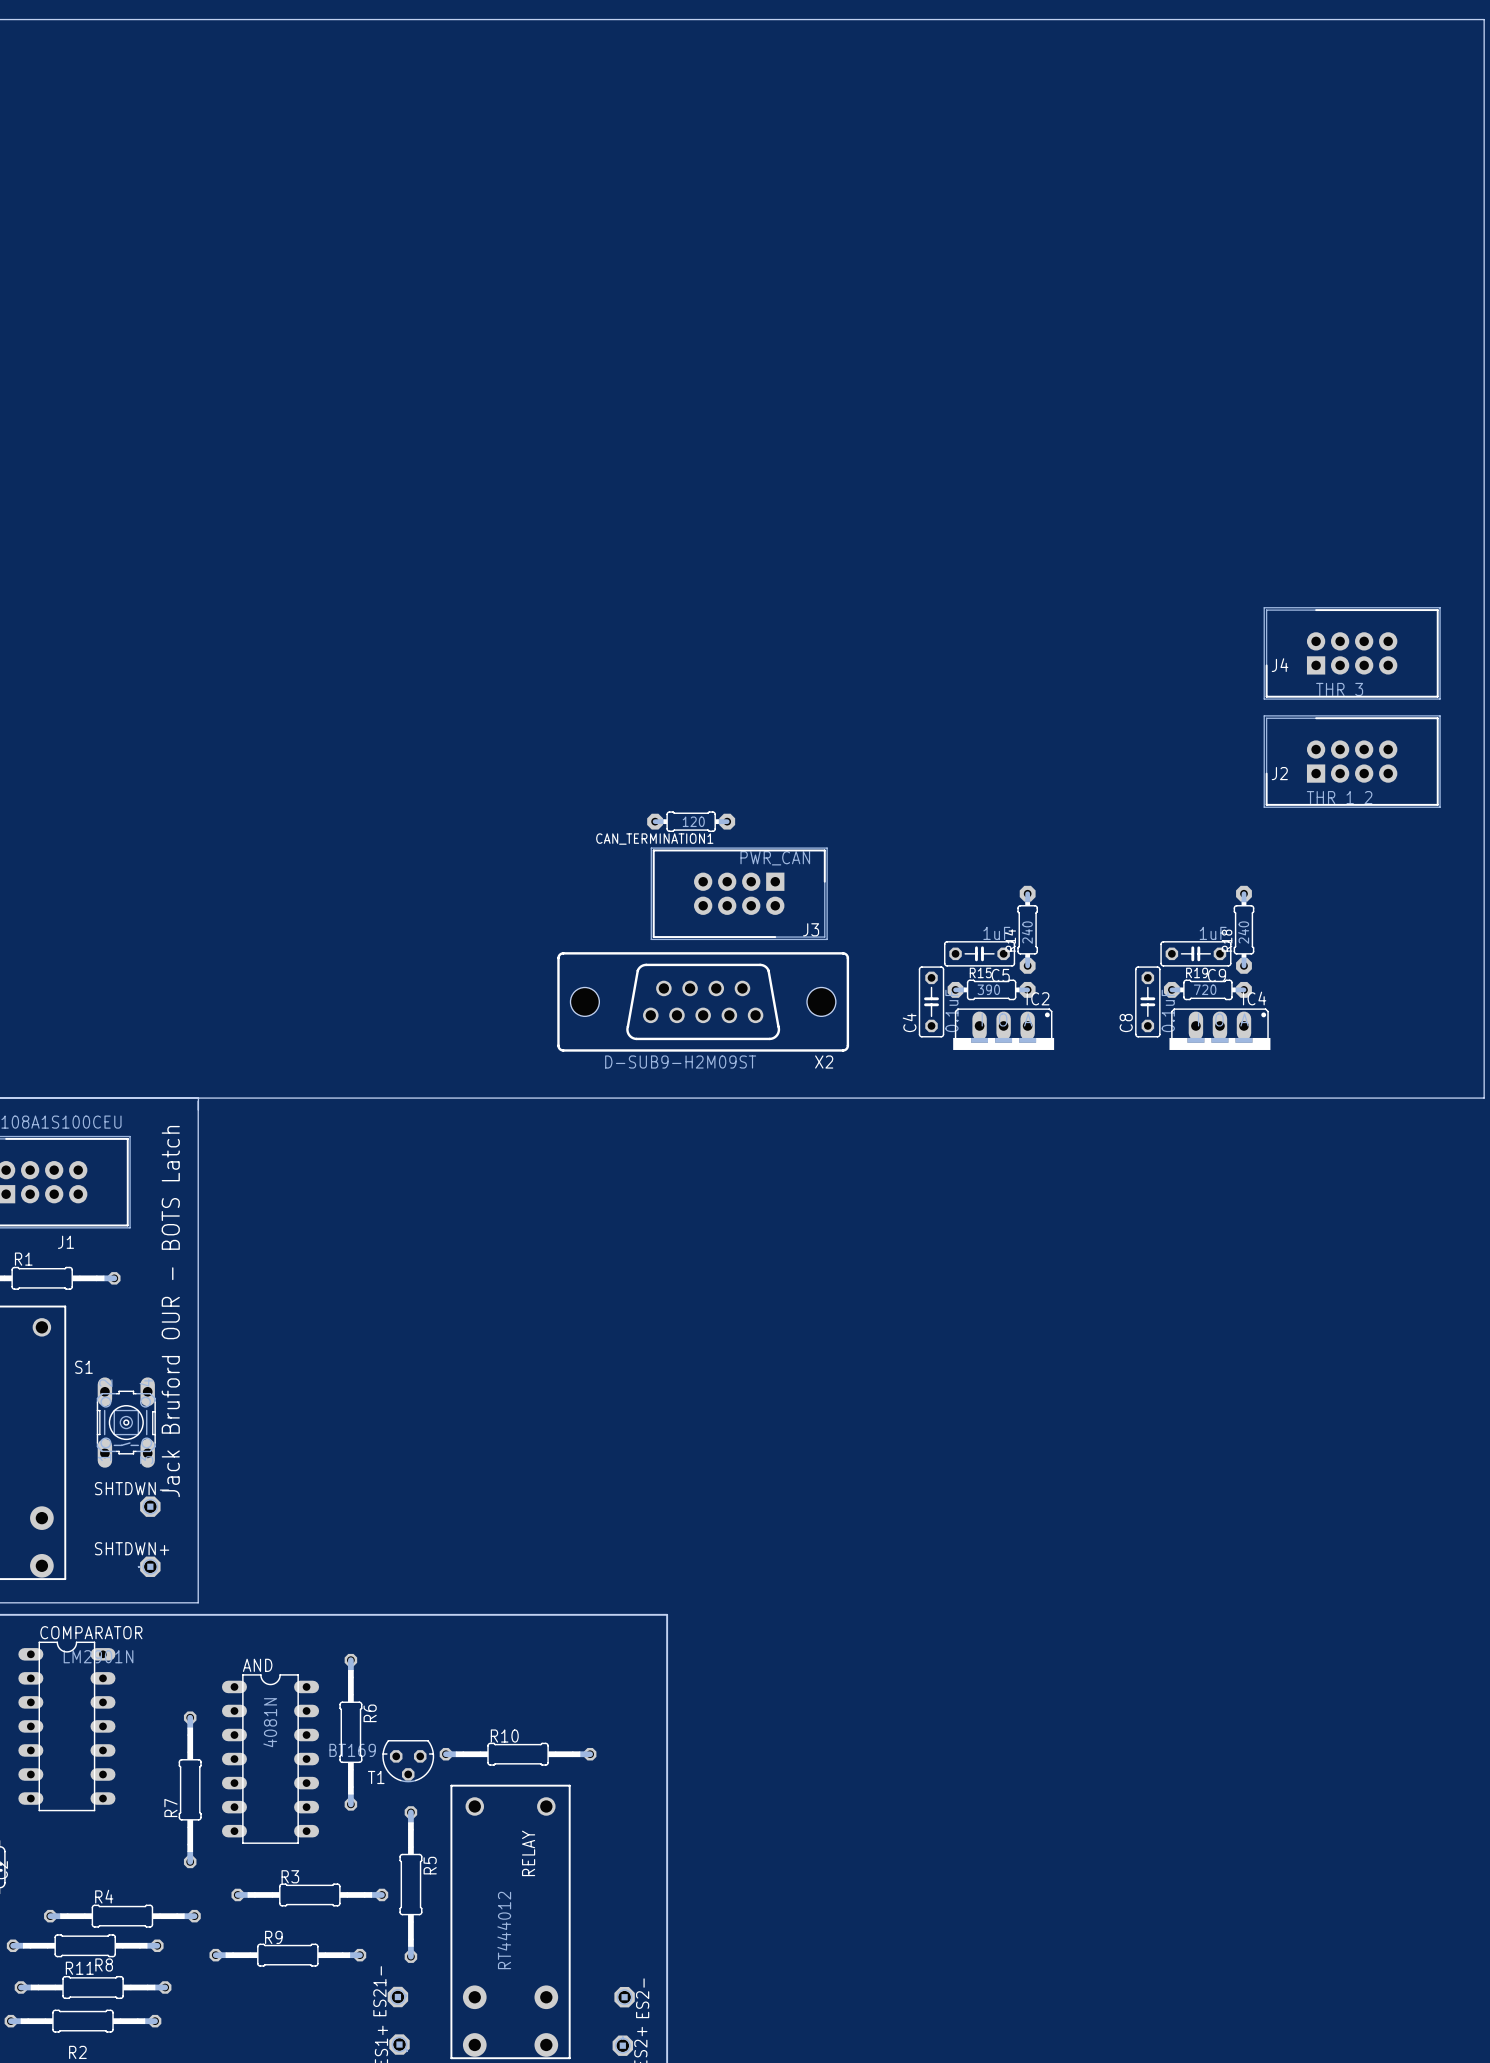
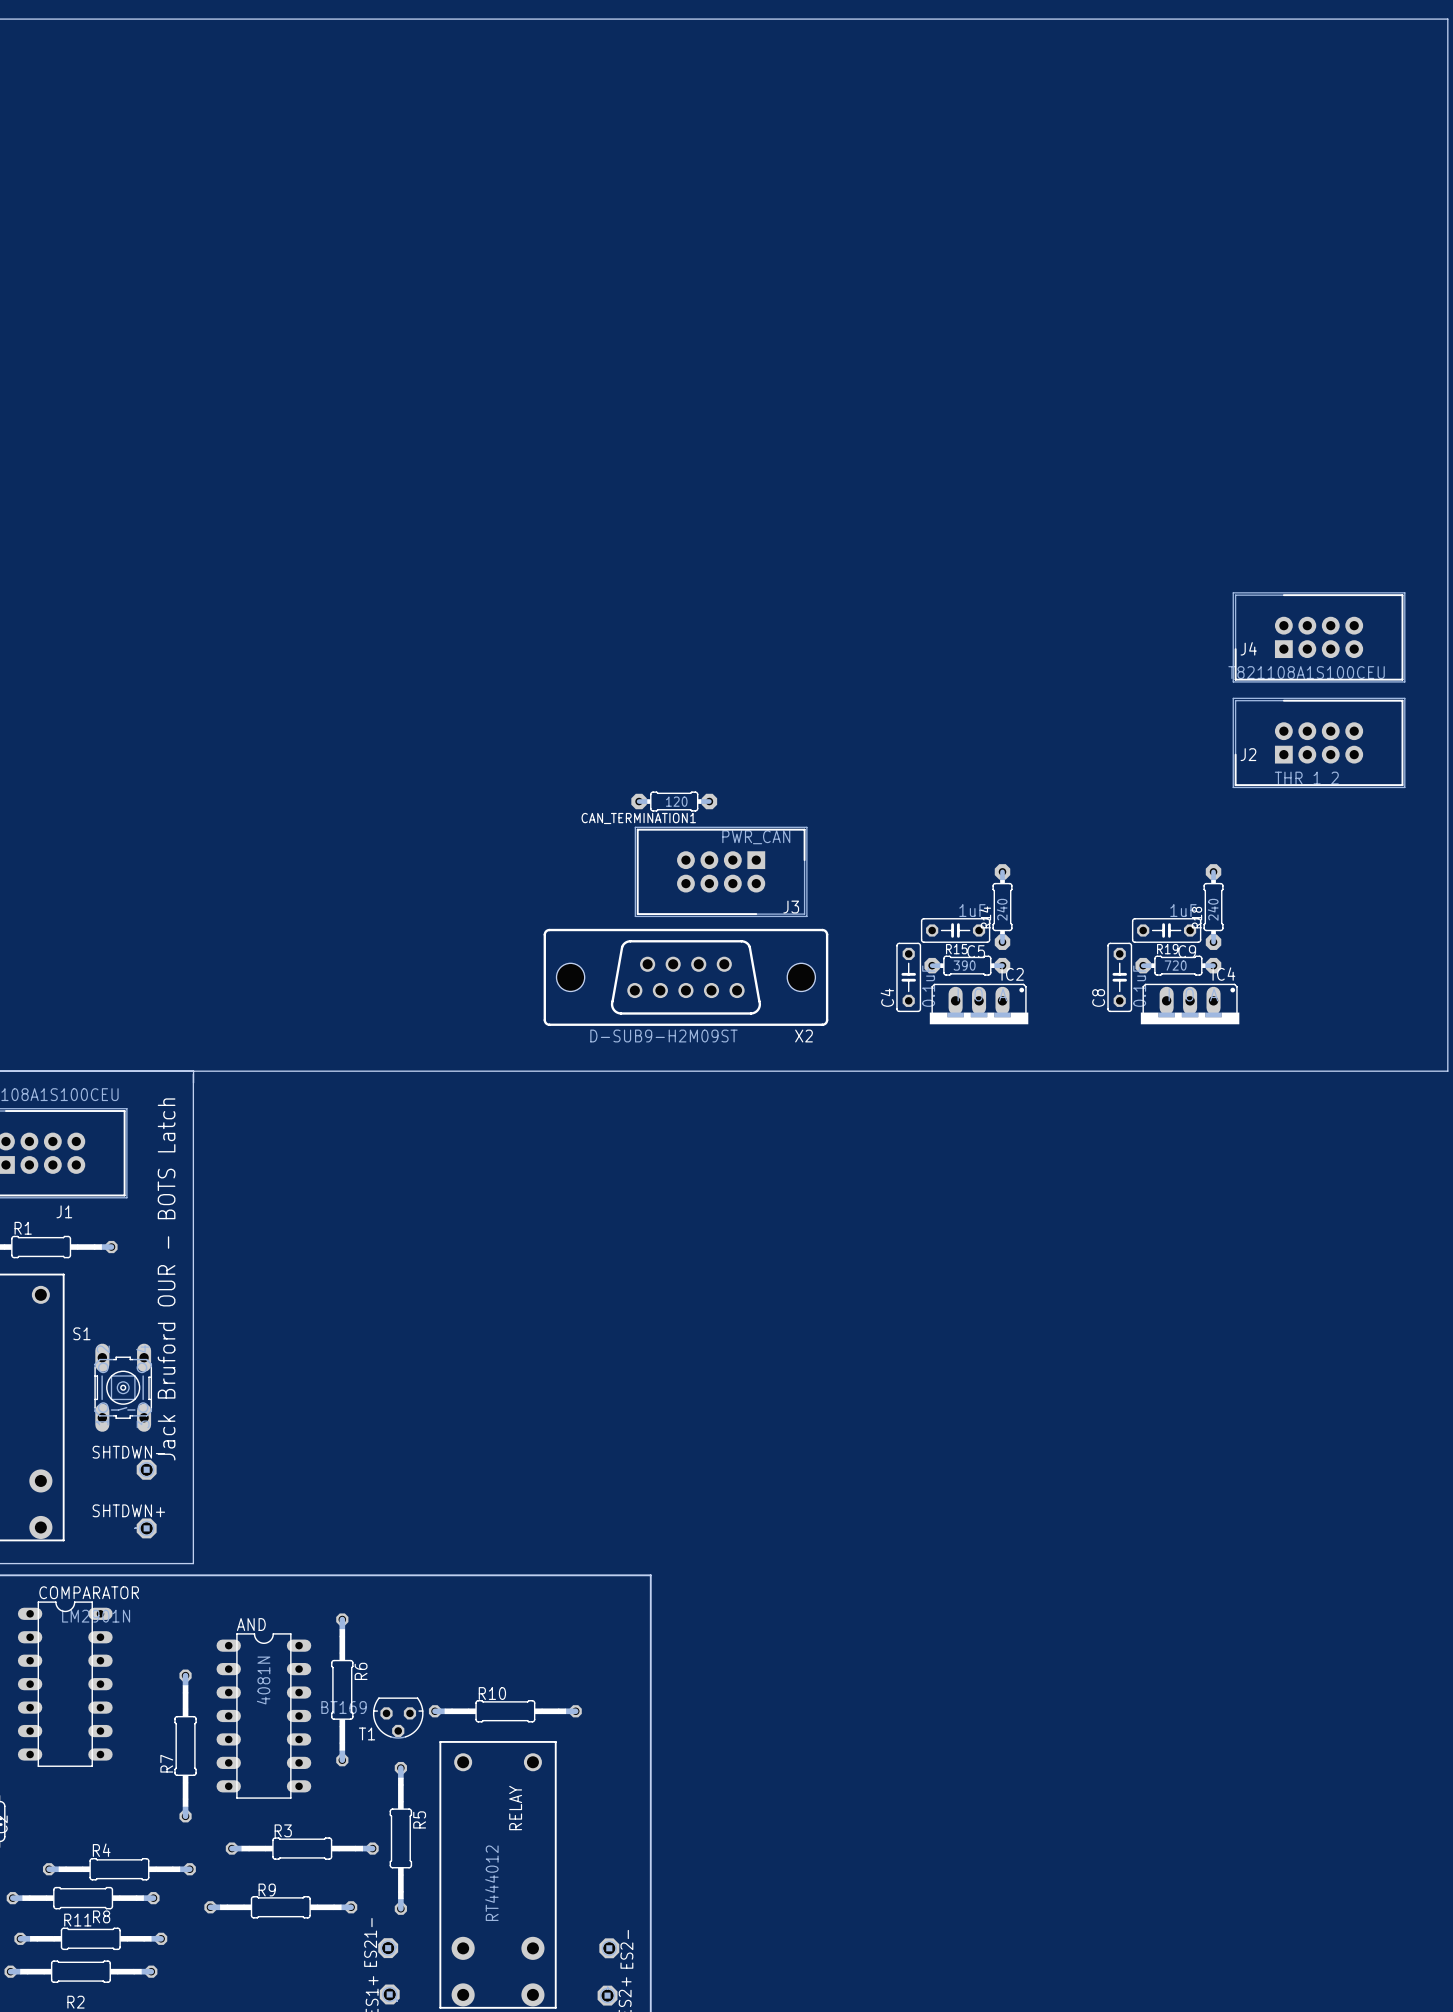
J4 value: THR_3 (1339, 690) -> T821108A1S100CEU (1306, 672)

